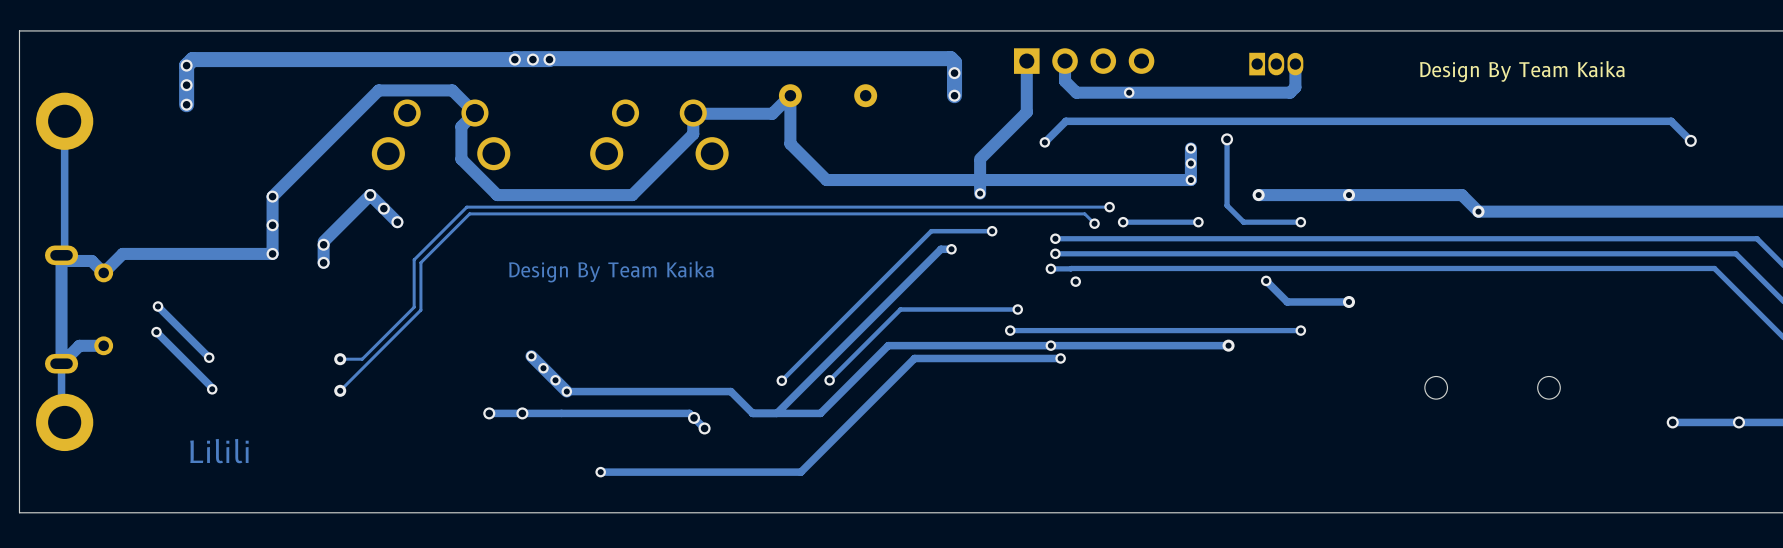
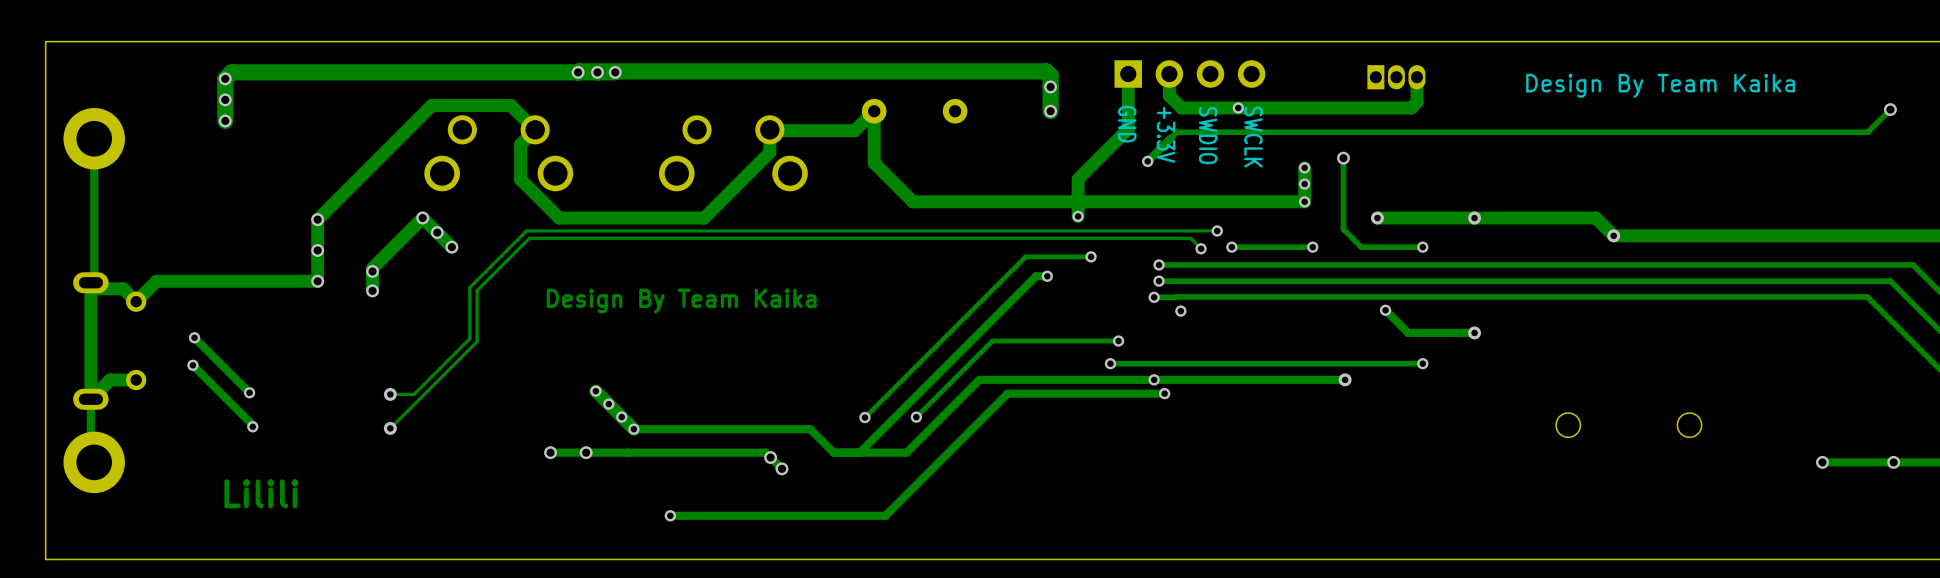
text: none -> GND (1127, 124)
text: none -> +3.3V (1166, 134)
text: none -> SWDIO (1208, 135)
text: none -> SWCLK (1253, 137)
track: (1065, 121) (1671, 121) (1690, 140) -> (1170, 138) (1176, 132) (1867, 132) (1890, 109)
via position: (1690, 140) -> (1890, 109)

